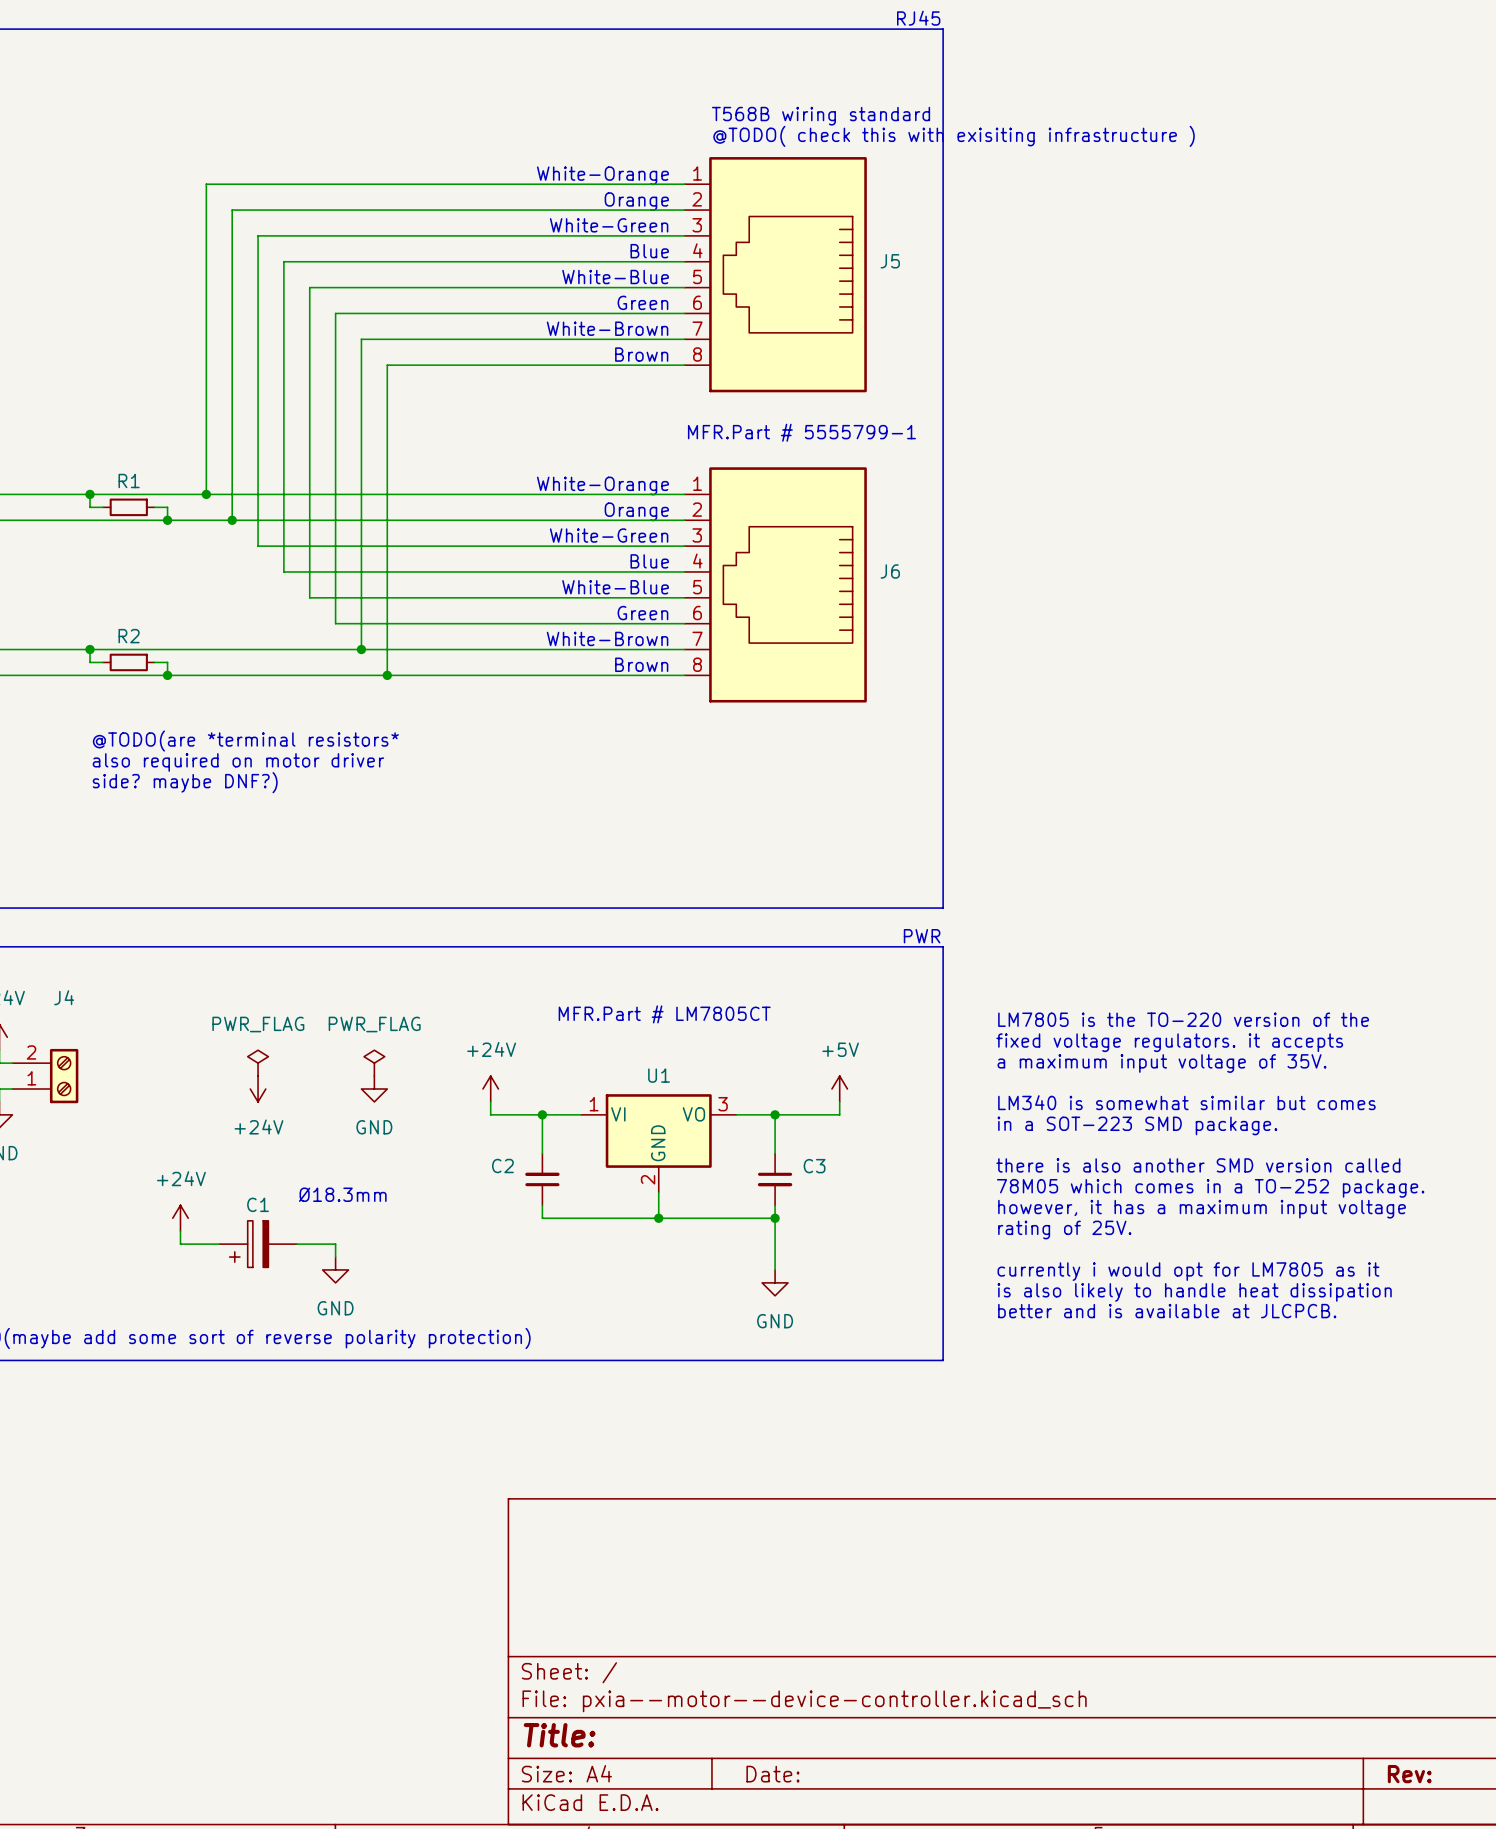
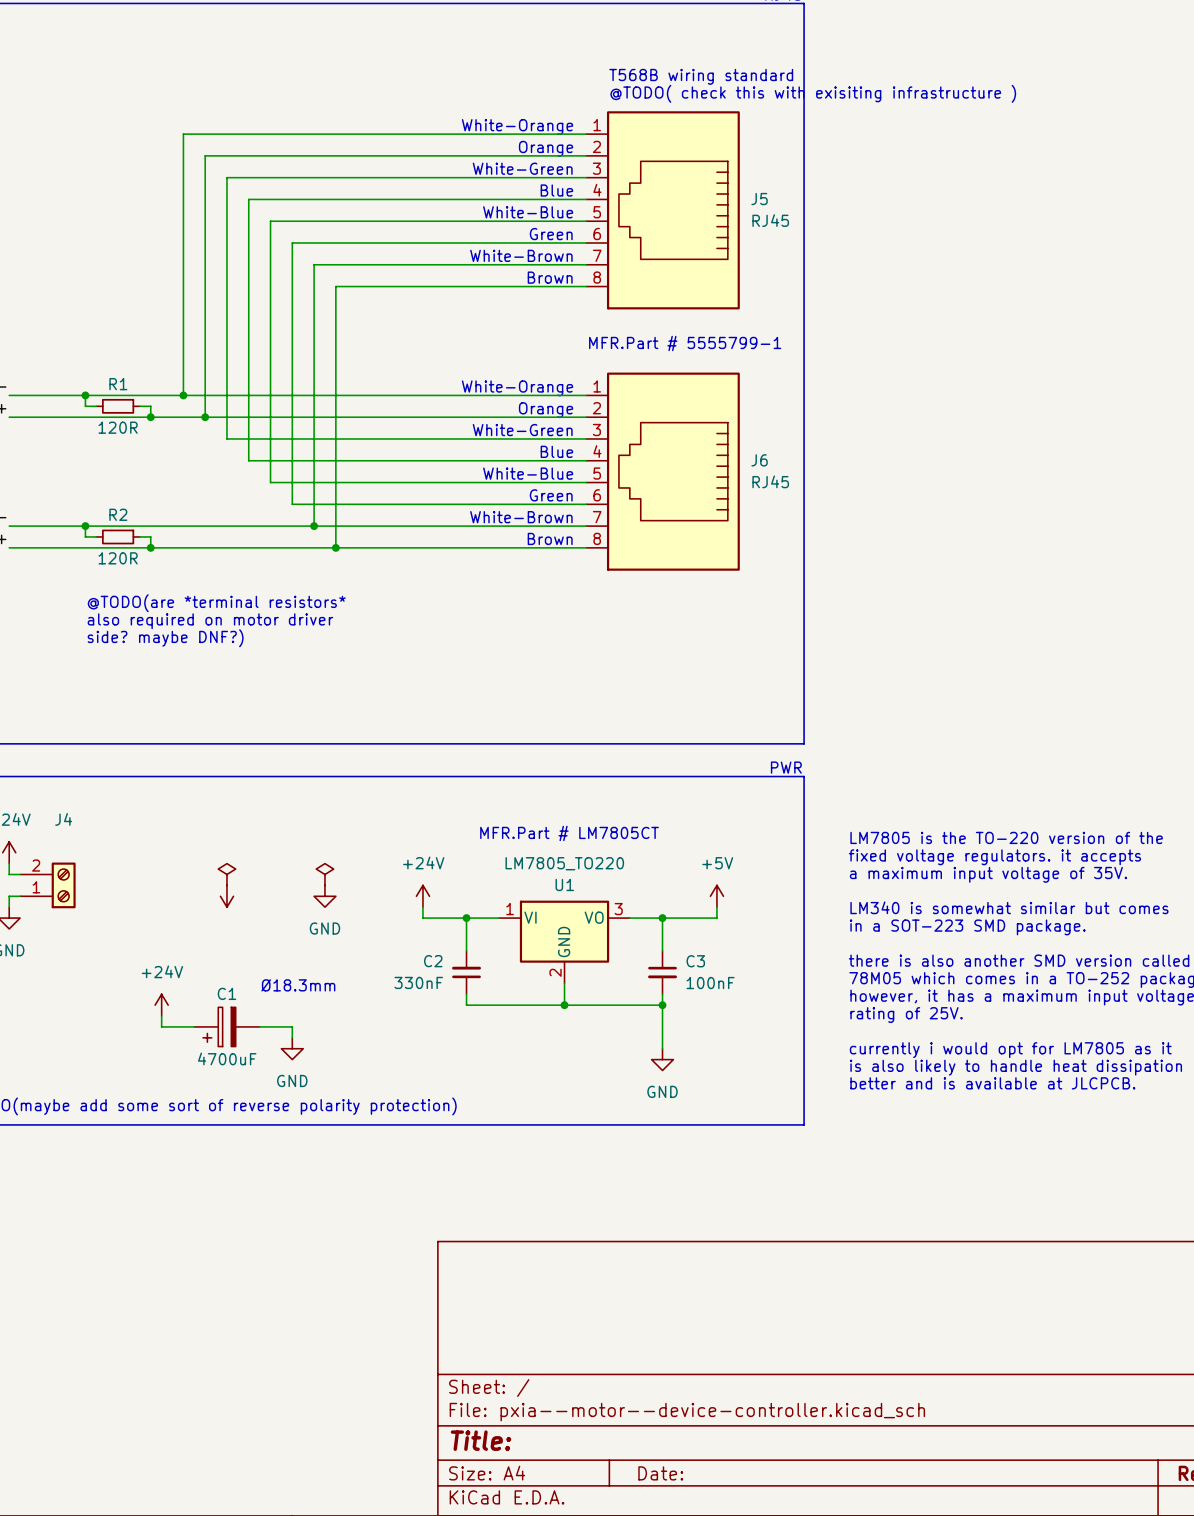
J5 value: none -> RJ45 (770, 220)
R1 value: none -> 120R (118, 427)
J6 value: none -> RJ45 (770, 481)
R2 value: none -> 120R (118, 558)
power symbol text: PWR_FLAG (258, 1024) -> none
power symbol text: PWR_FLAG (374, 1024) -> none
U1 value: none -> LM7805_TO220 (564, 863)
power symbol text: +24V (258, 1126) -> none
C2 value: none -> 330nF (418, 982)
C3 value: none -> 100nF (710, 983)
C1 value: none -> 4700uF (227, 1058)

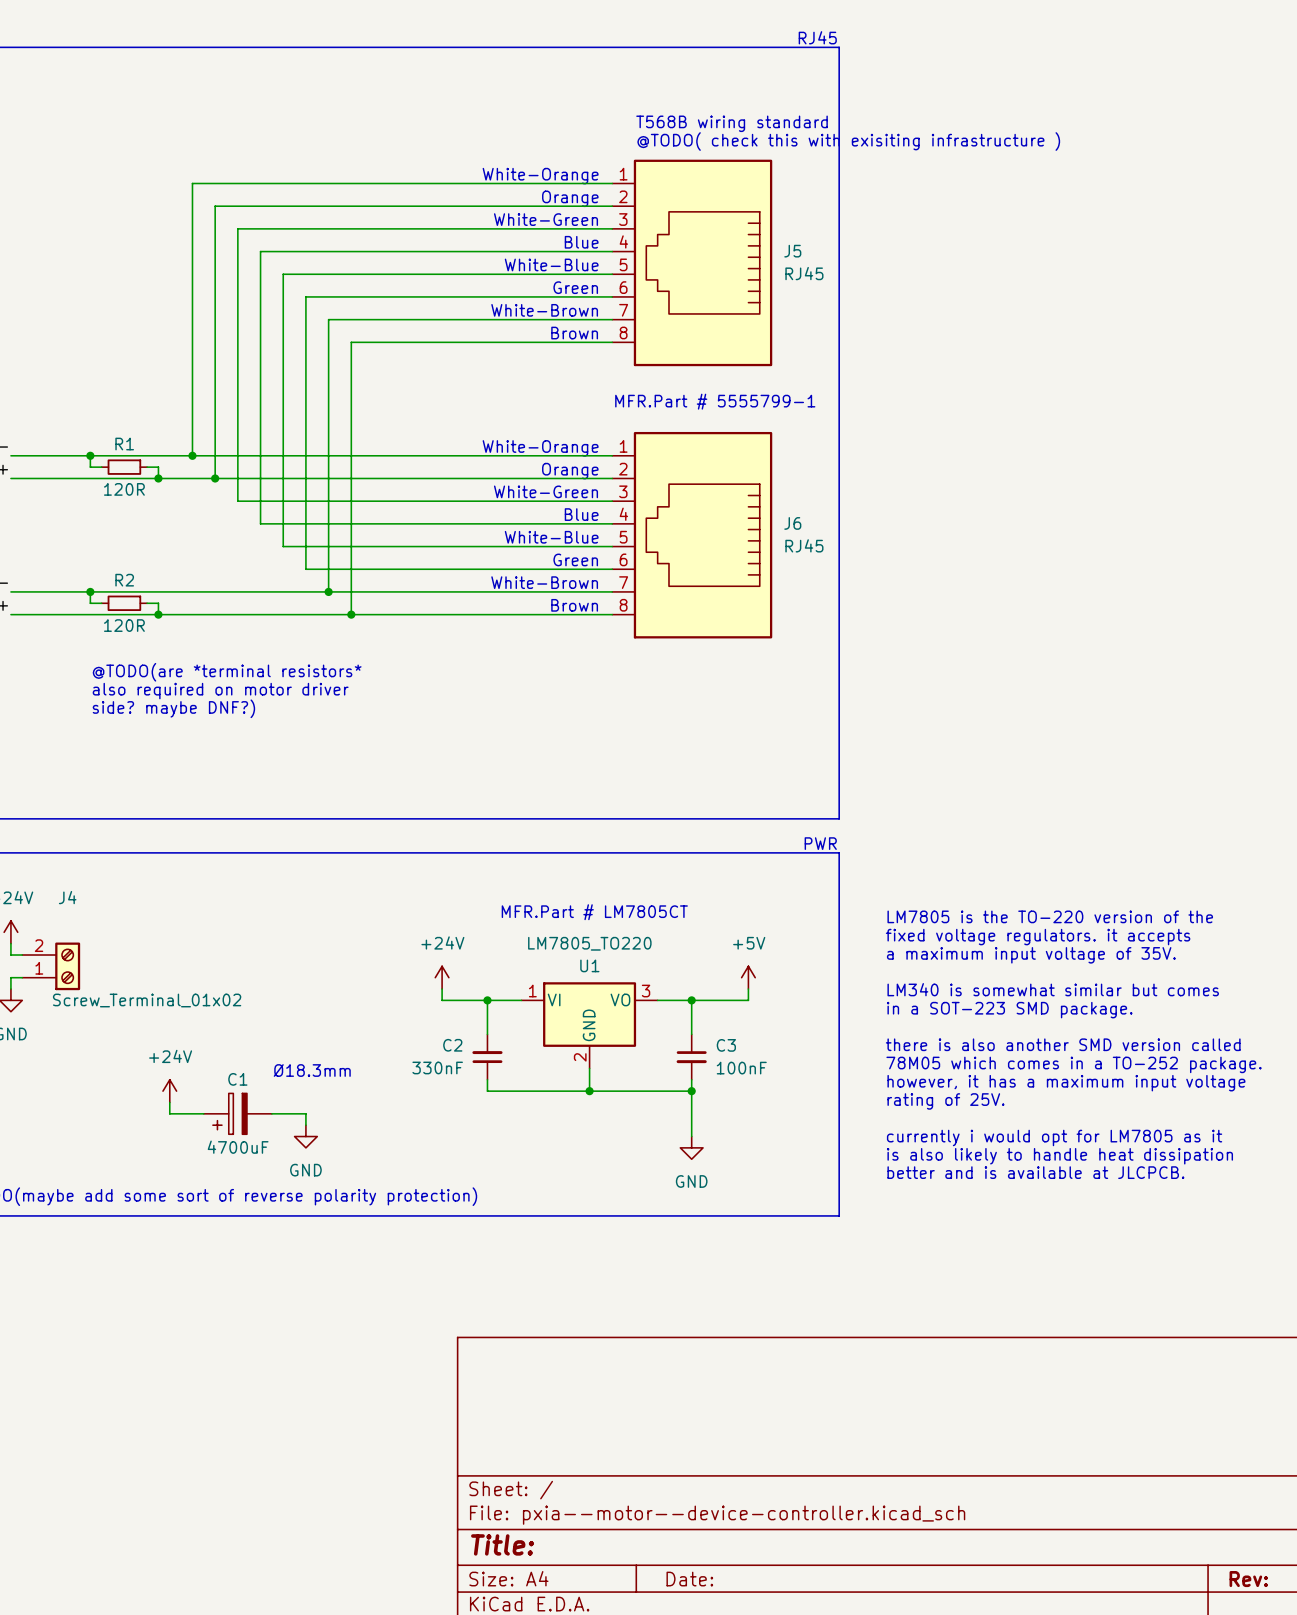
power symbol: (226, 874) -> none
power symbol: (324, 874) -> none
power symbol: (226, 896) -> none
power symbol: GND (324, 896) -> none
J4 value: none -> Screw_Terminal_01x02 (147, 1000)

